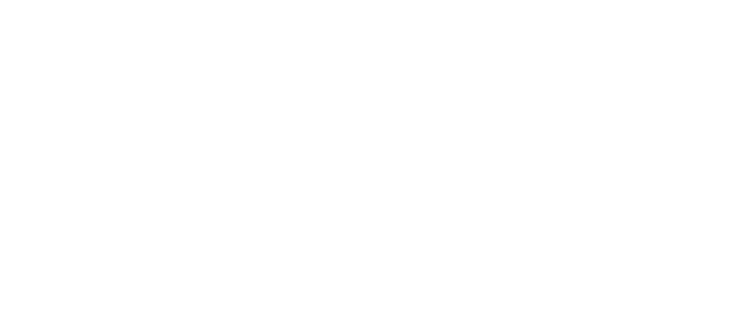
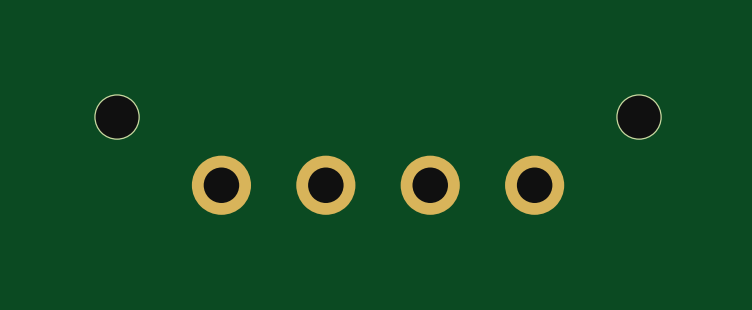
part: none -> (378, 154)

